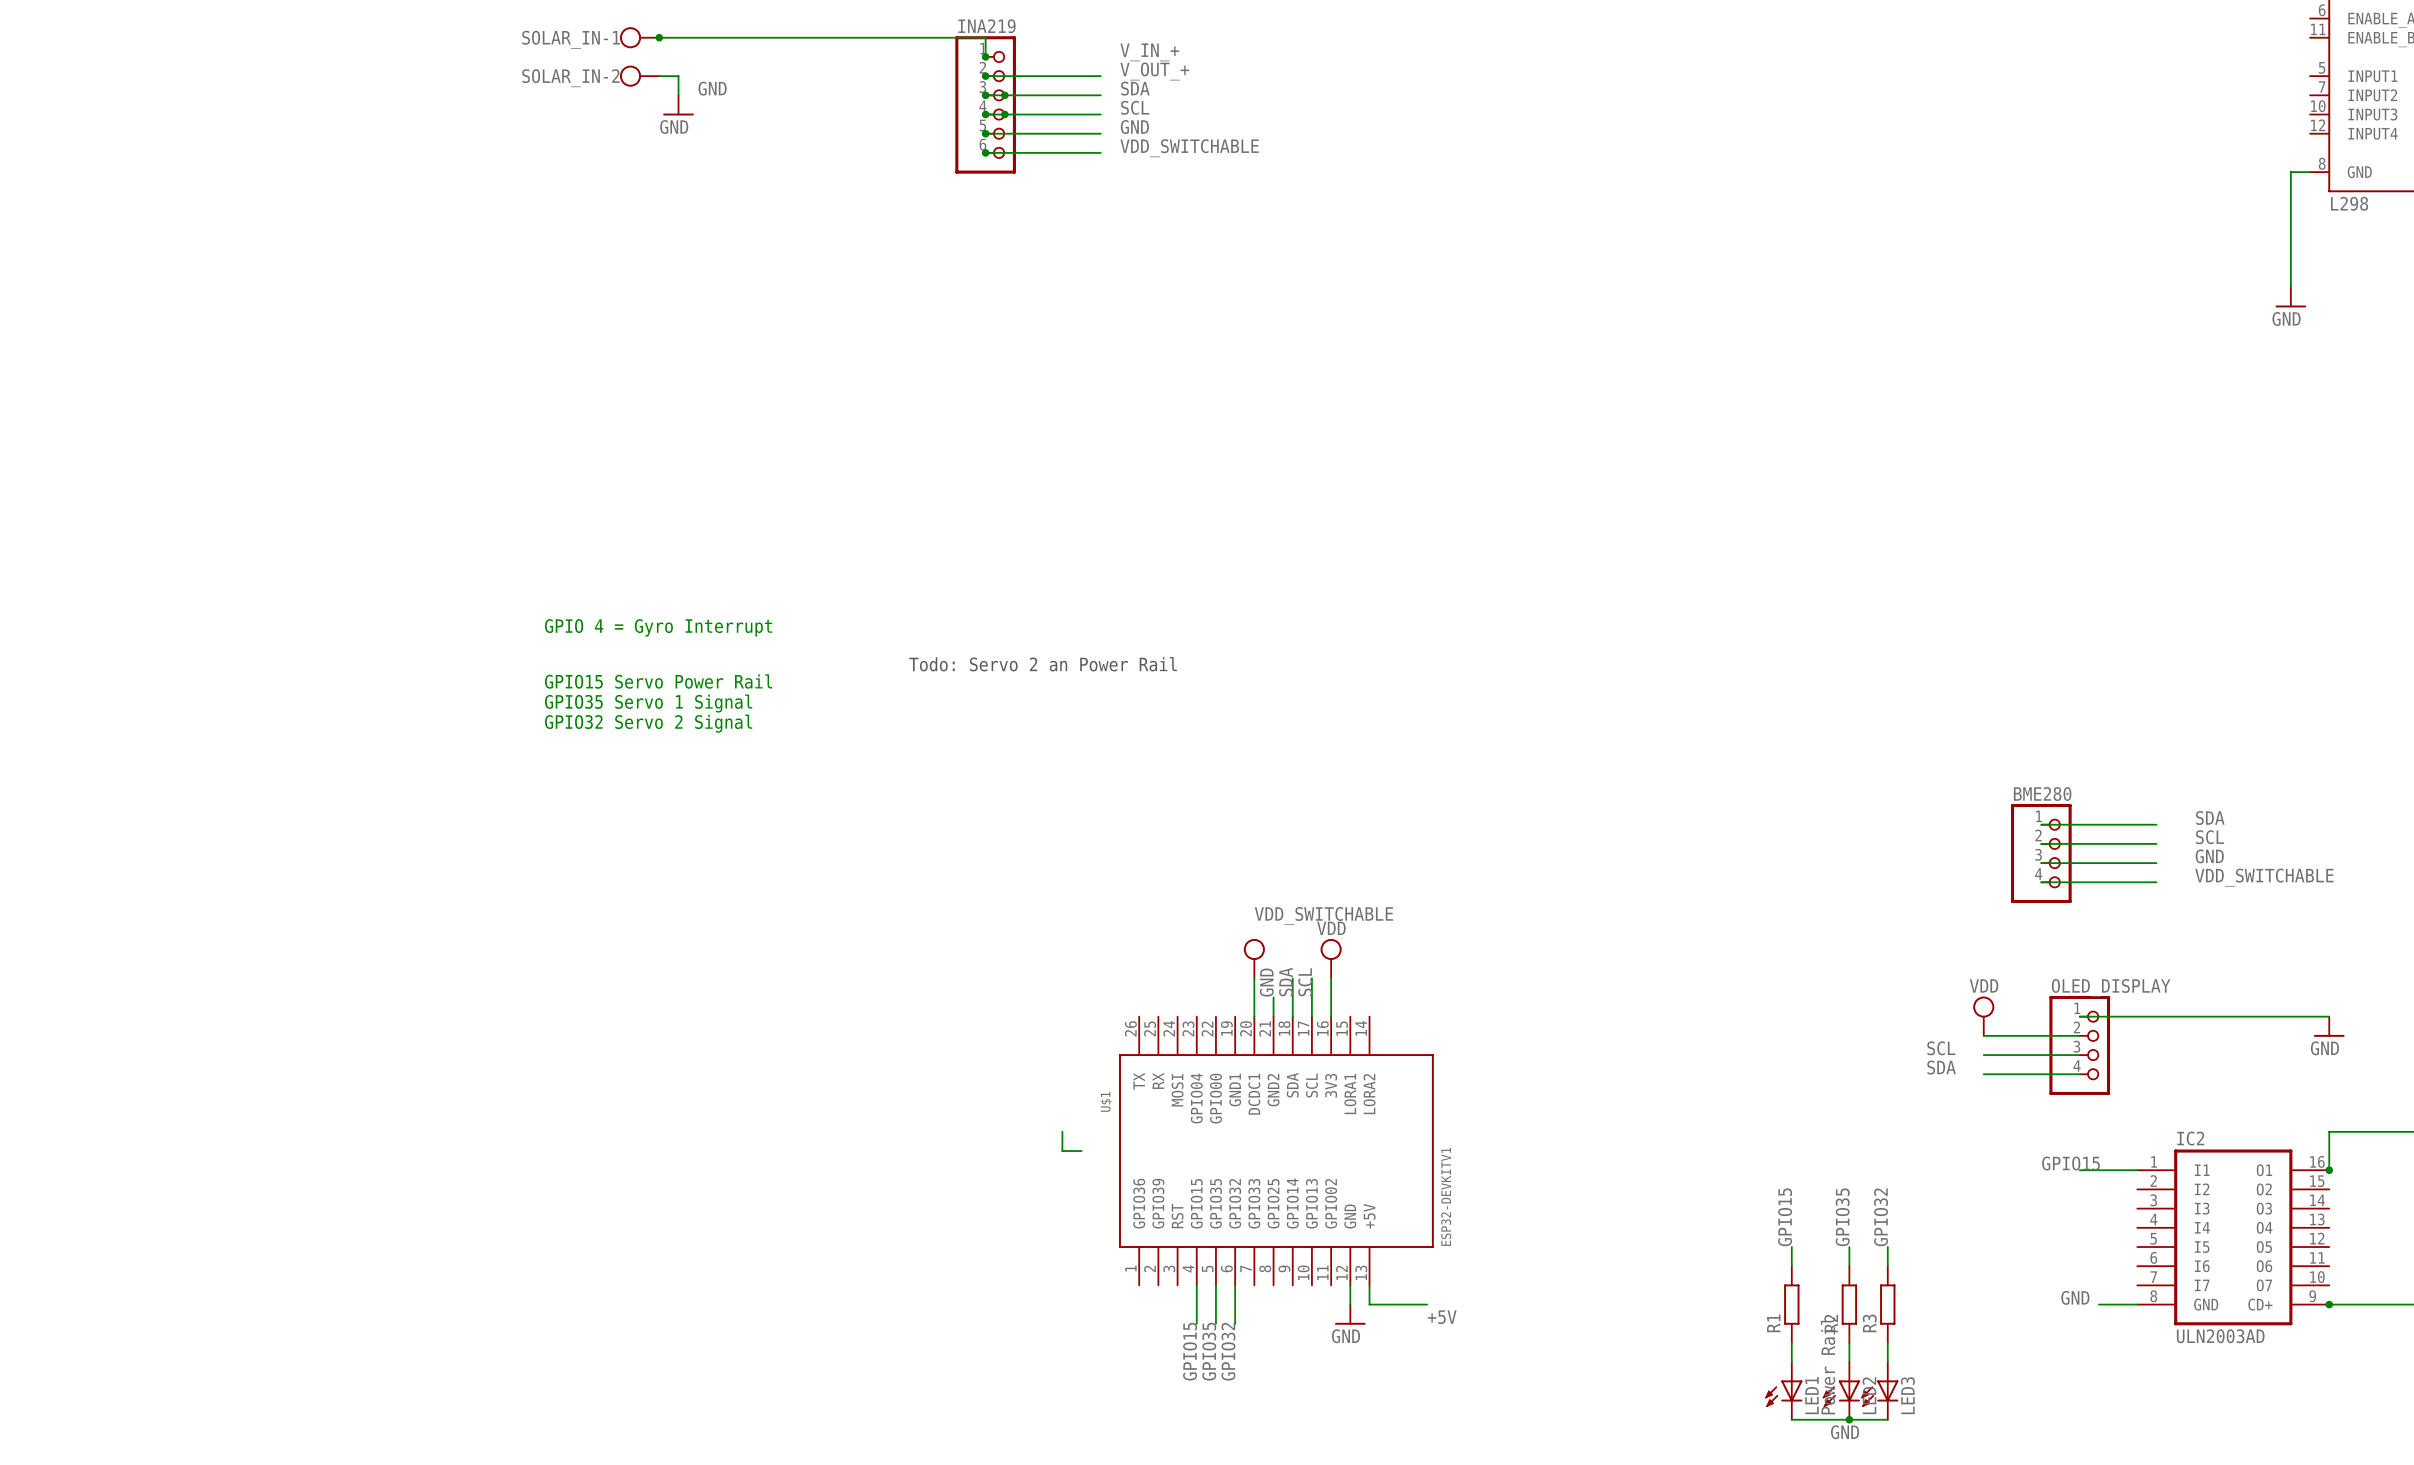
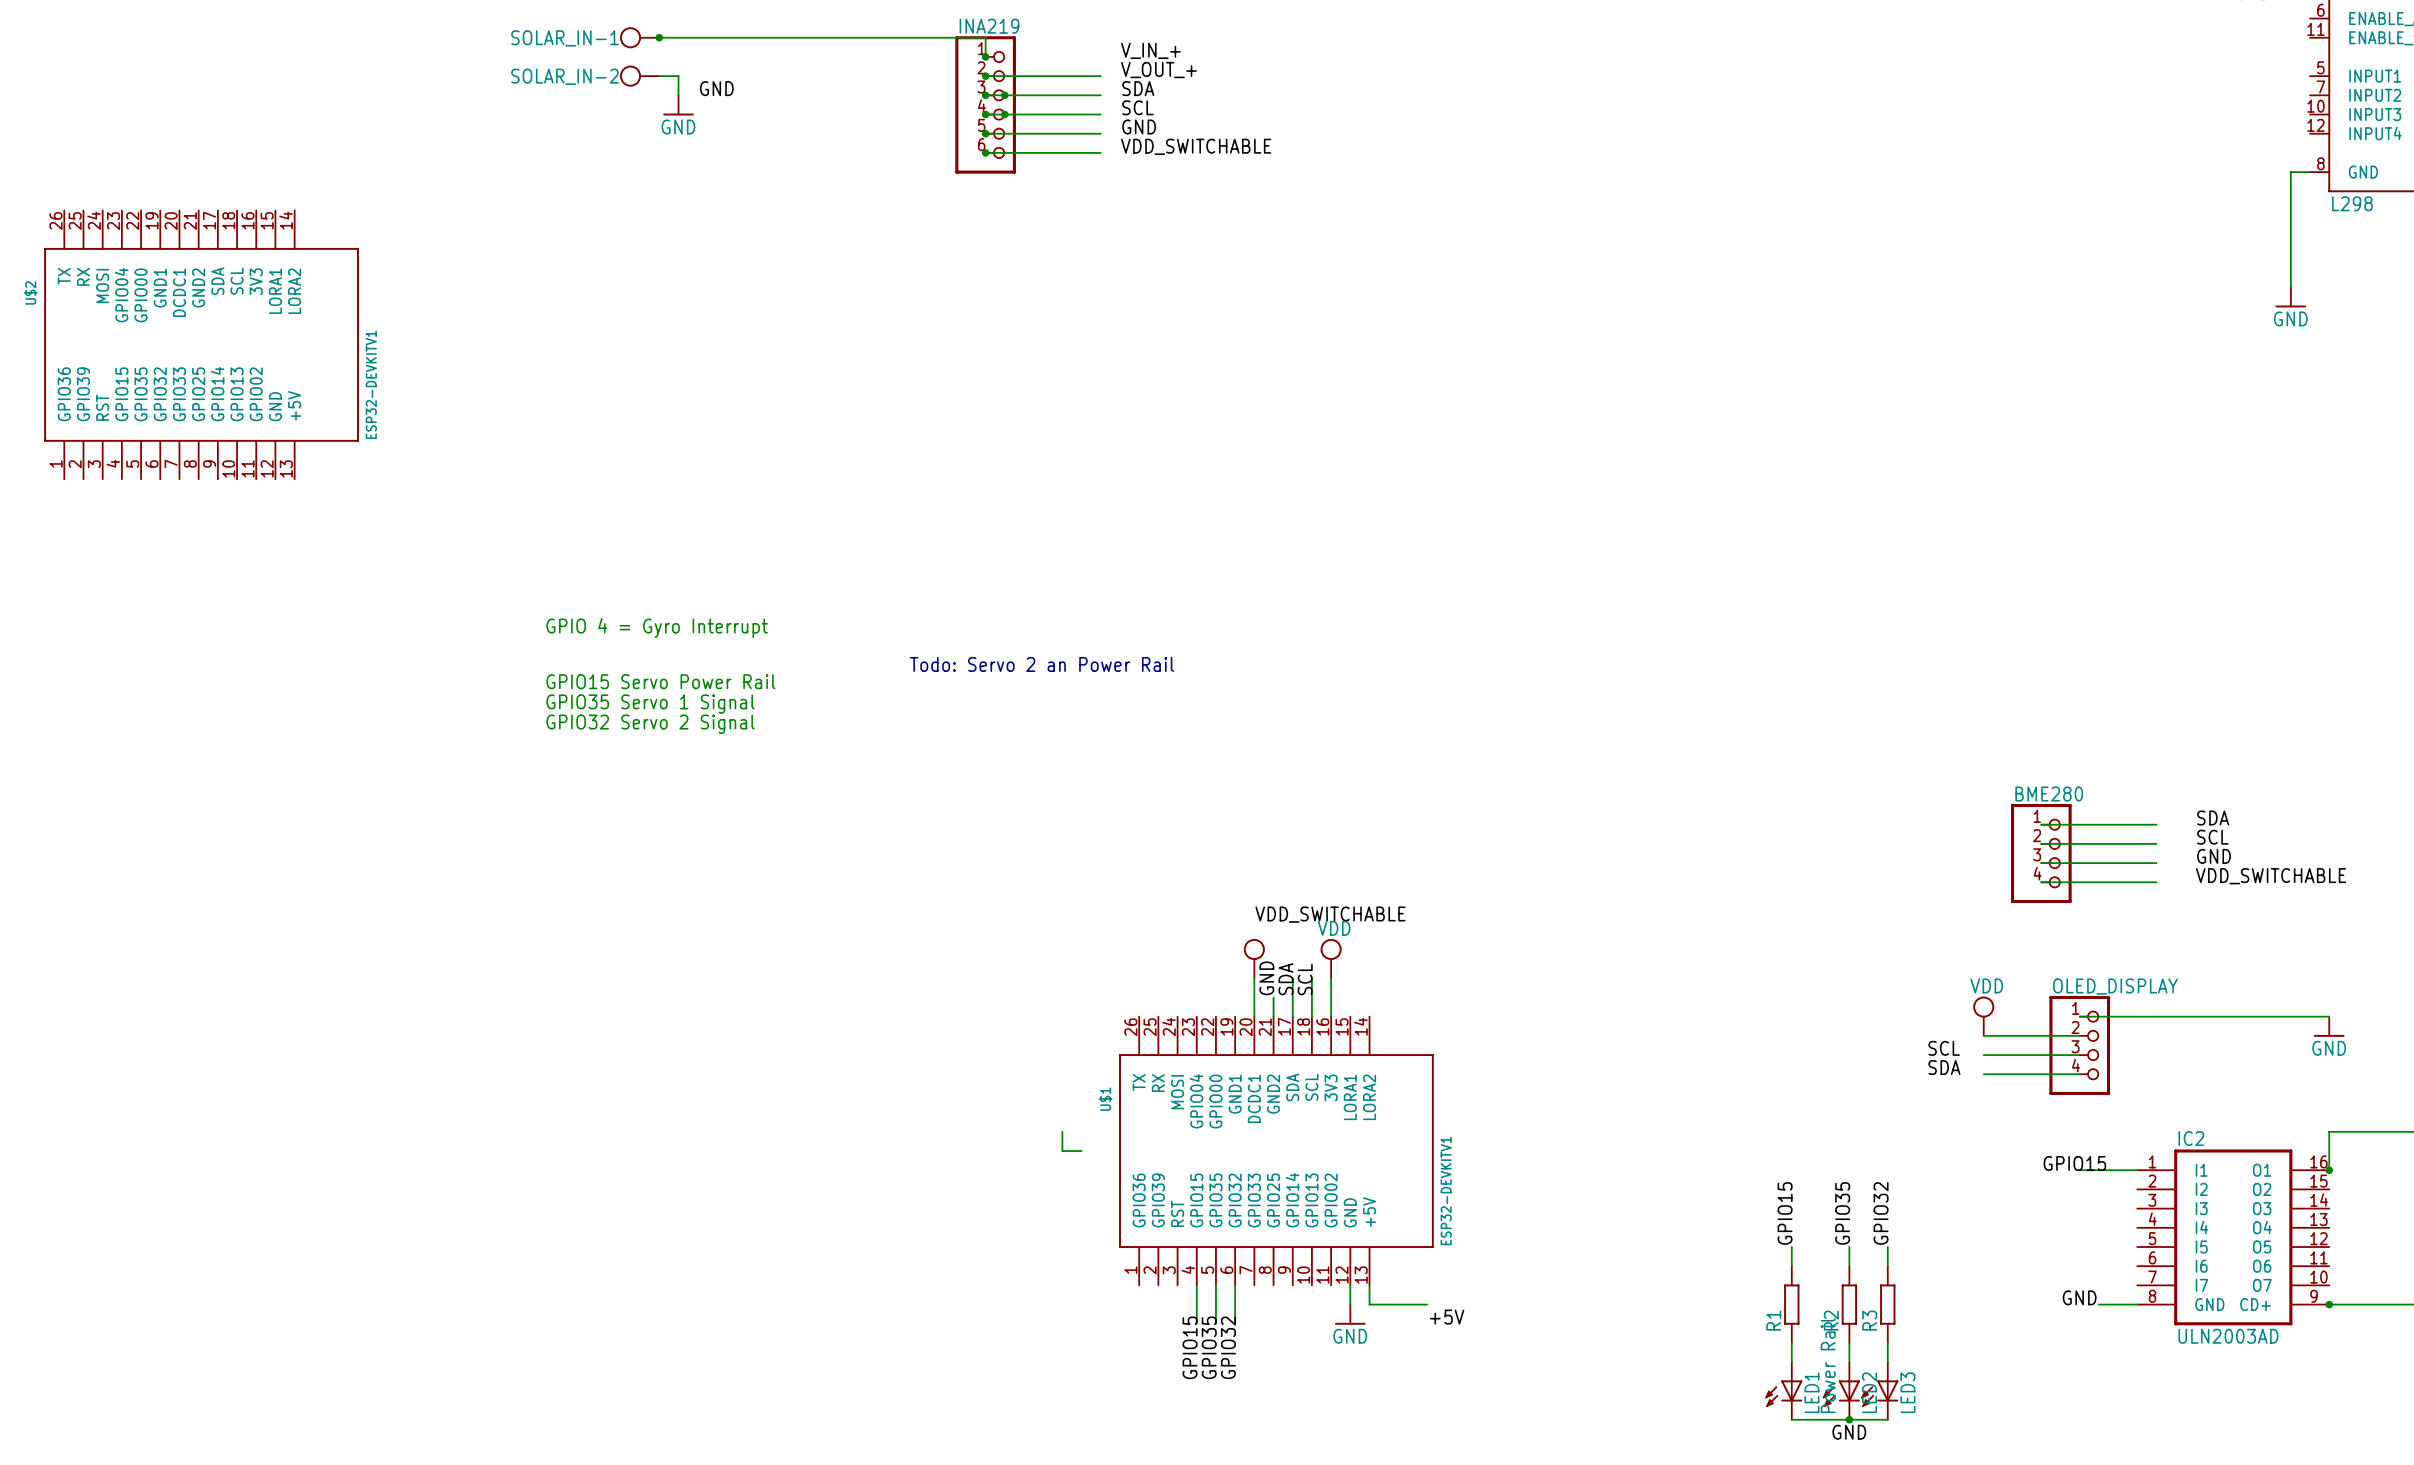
U$2: none -> (201, 344)
U$1 pin number: 18 (1284, 1028) -> 17 (1284, 1026)
U$1 pin number: 17 (1303, 1028) -> 18 (1303, 1026)

